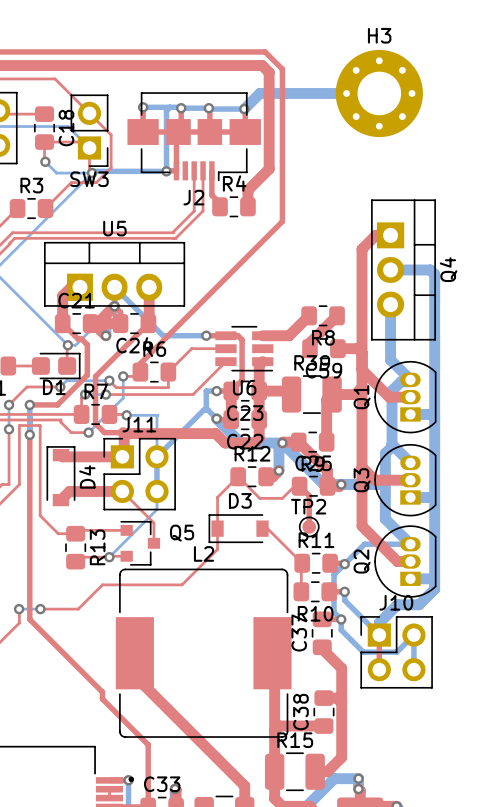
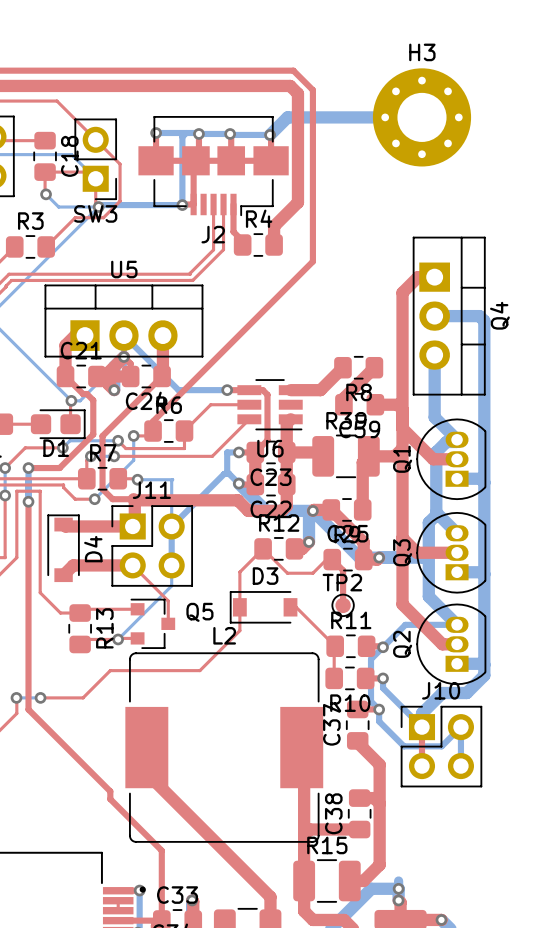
bottom track: none -> (398, 881) (398, 884)

